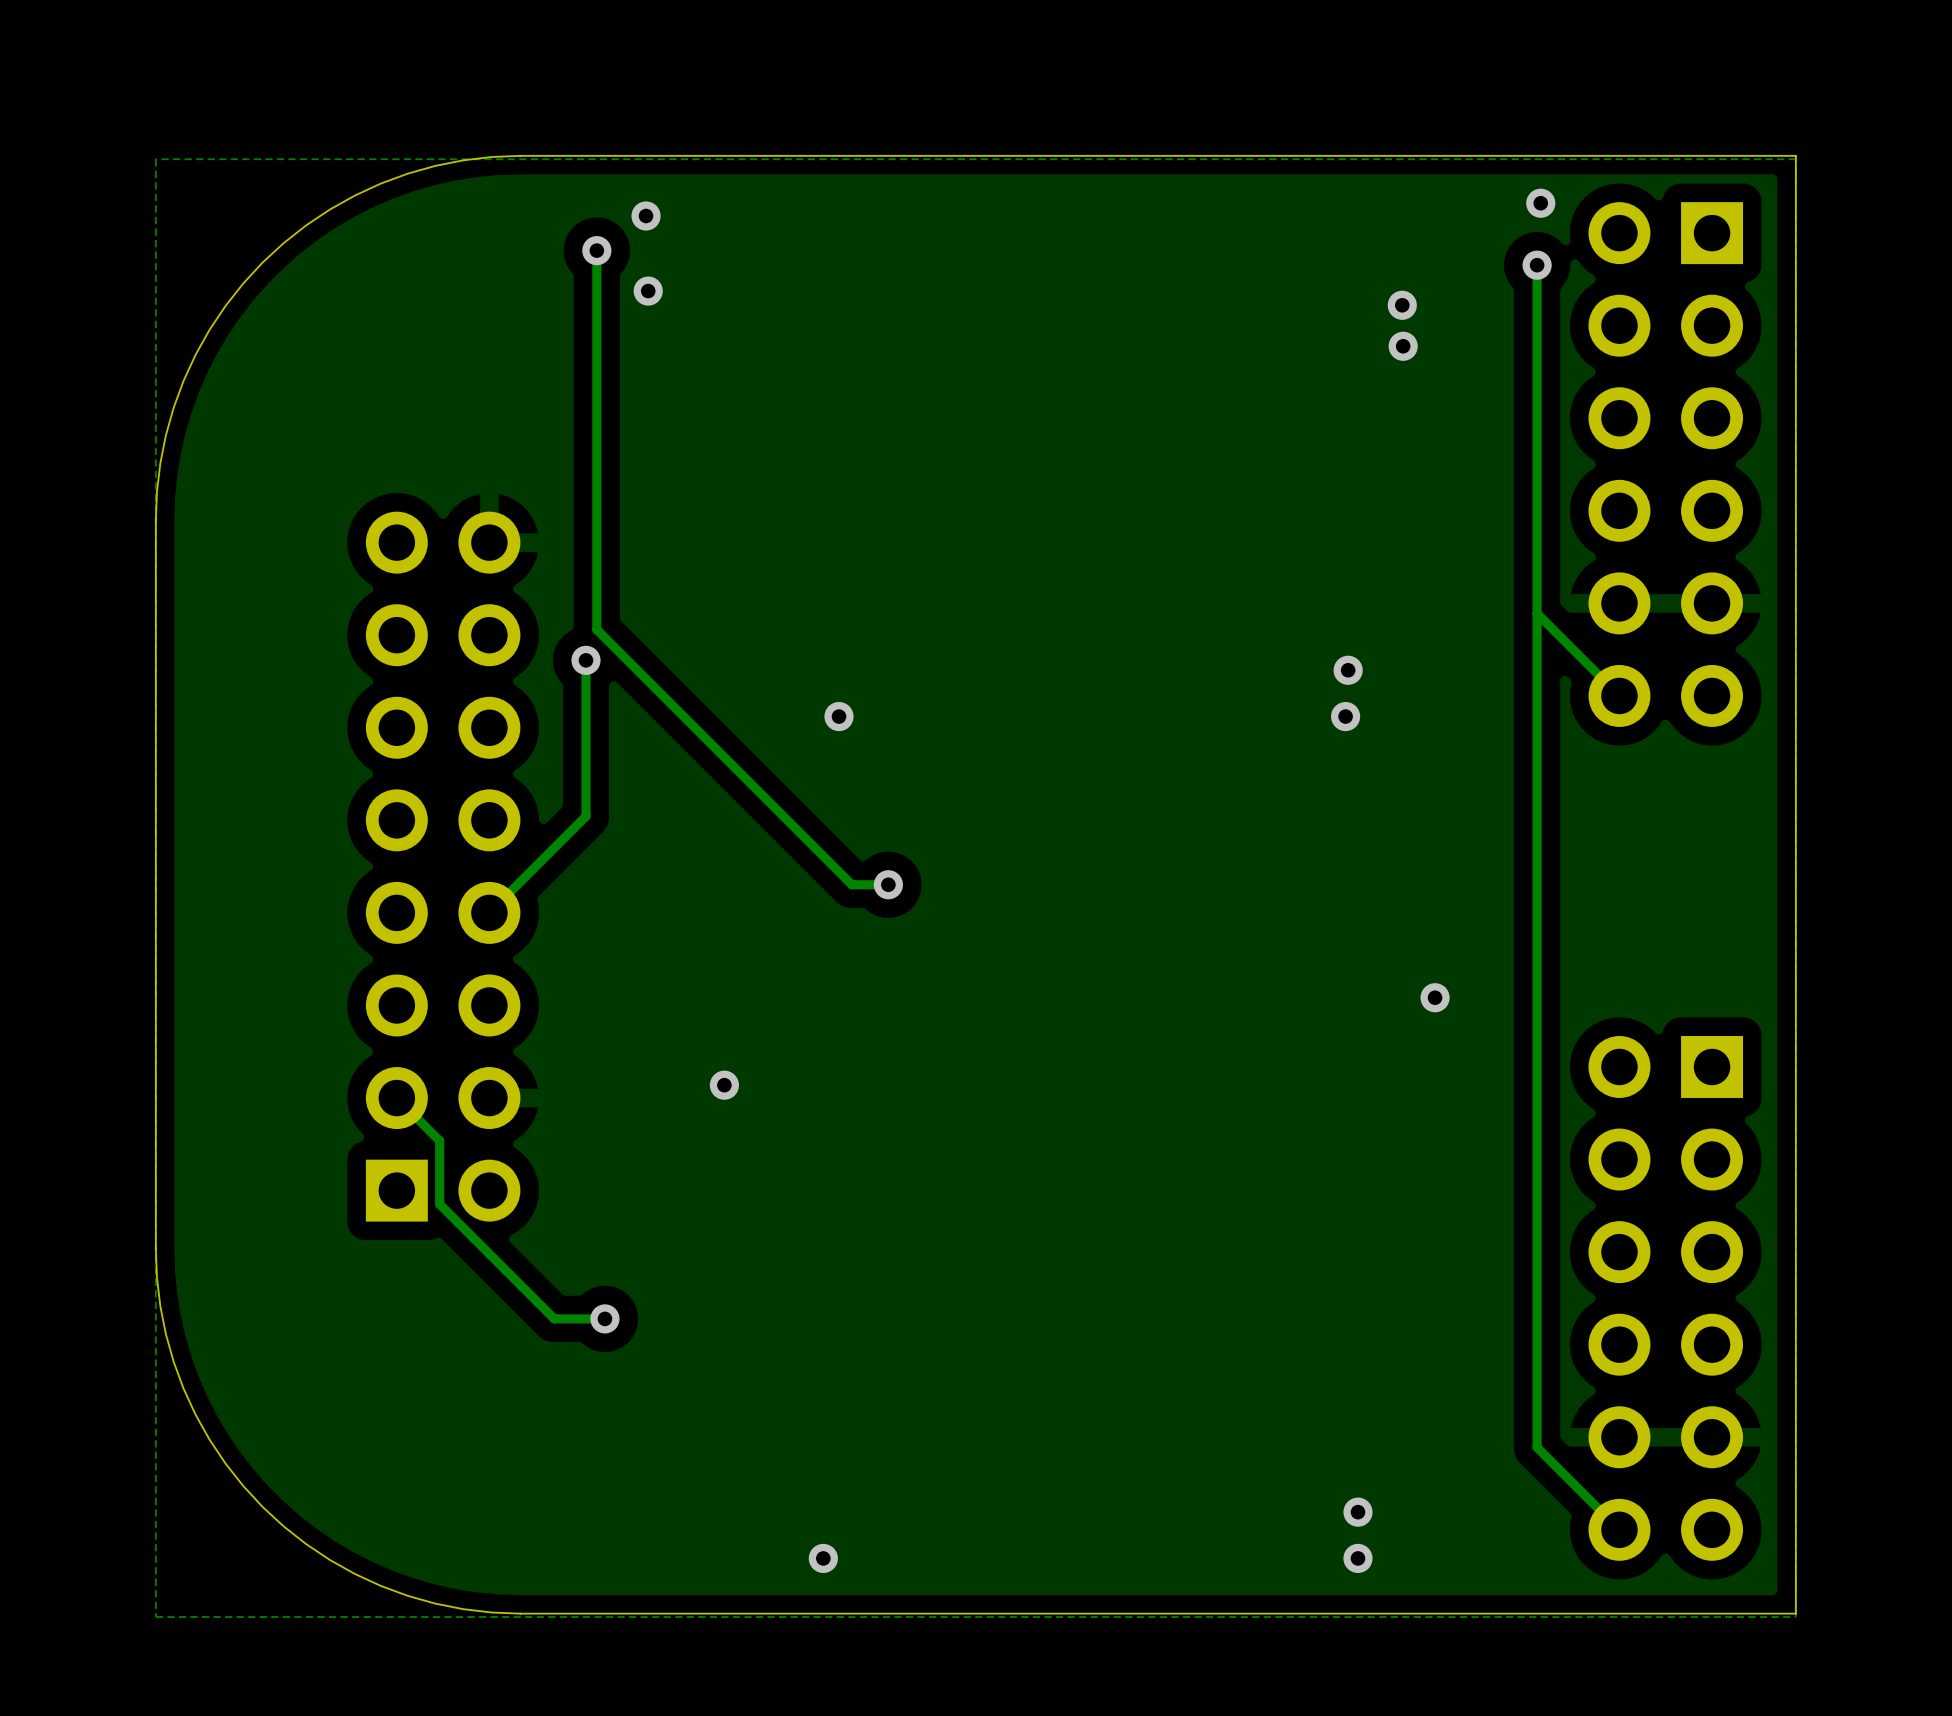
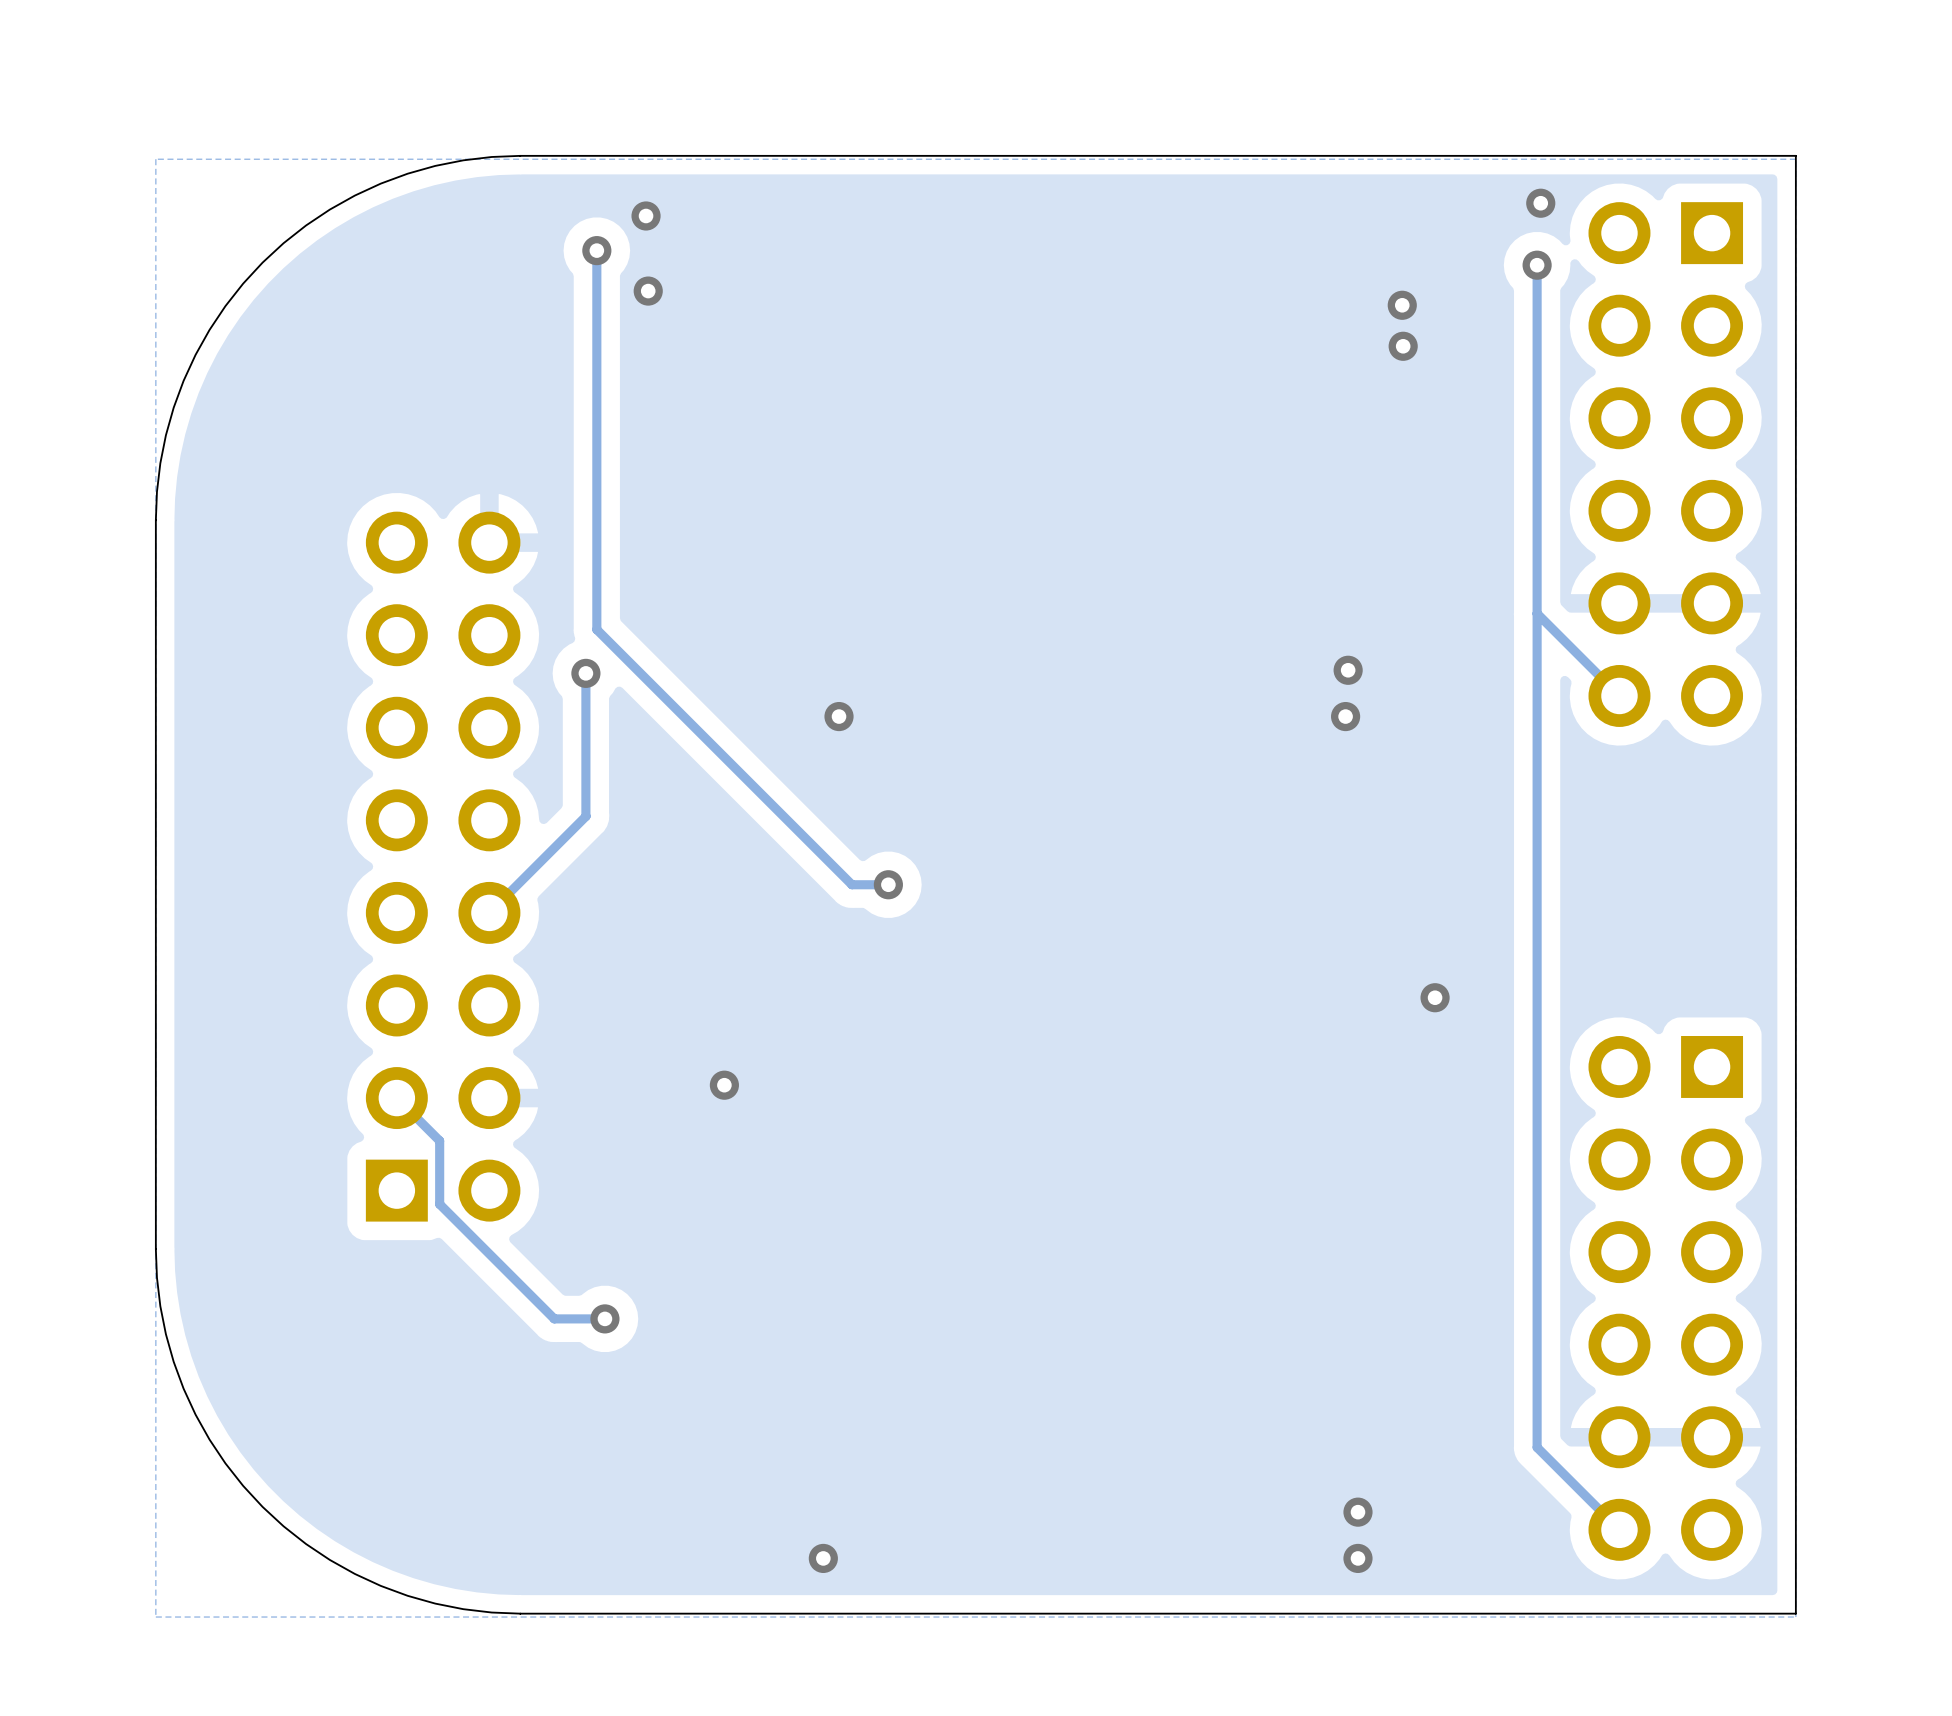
via position: (585, 660) -> (585, 673)

